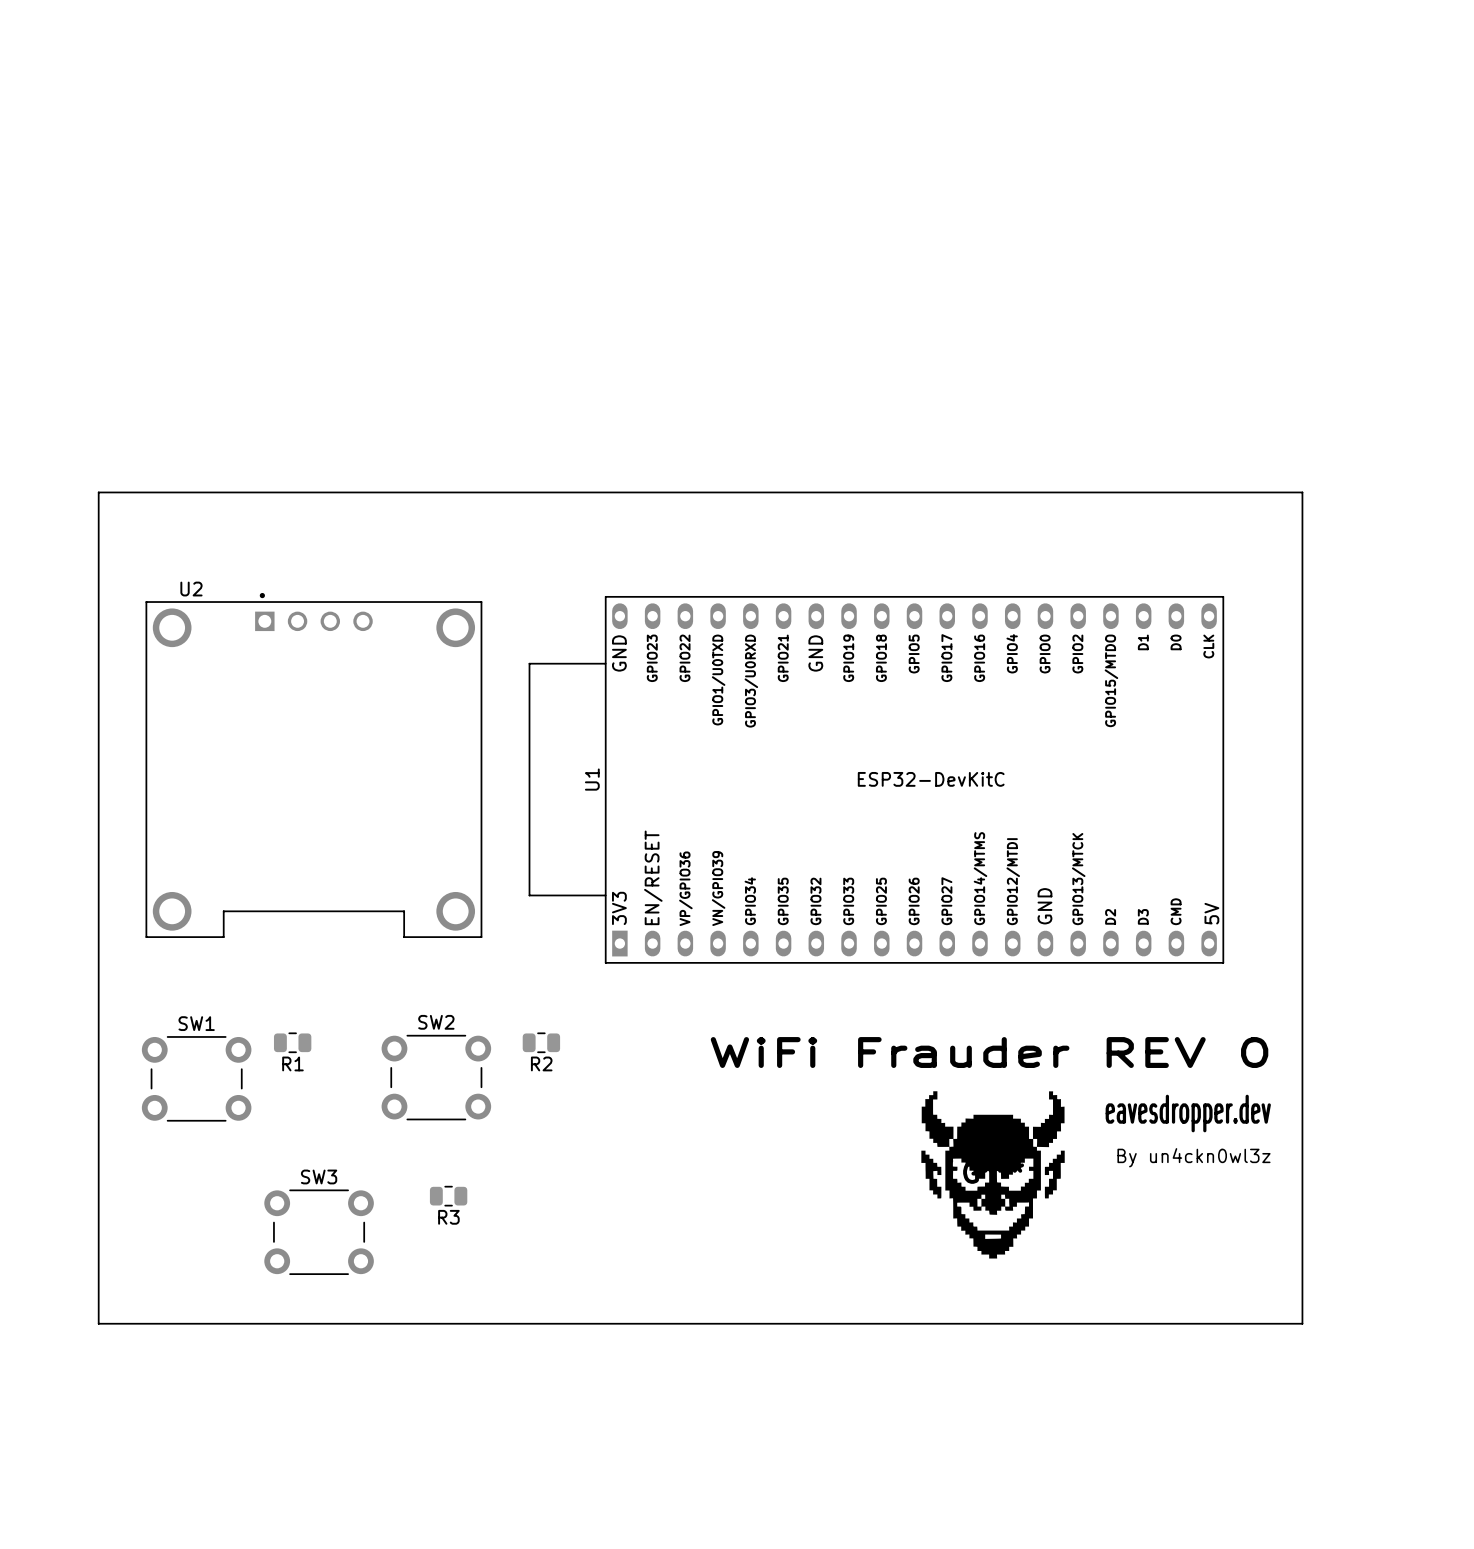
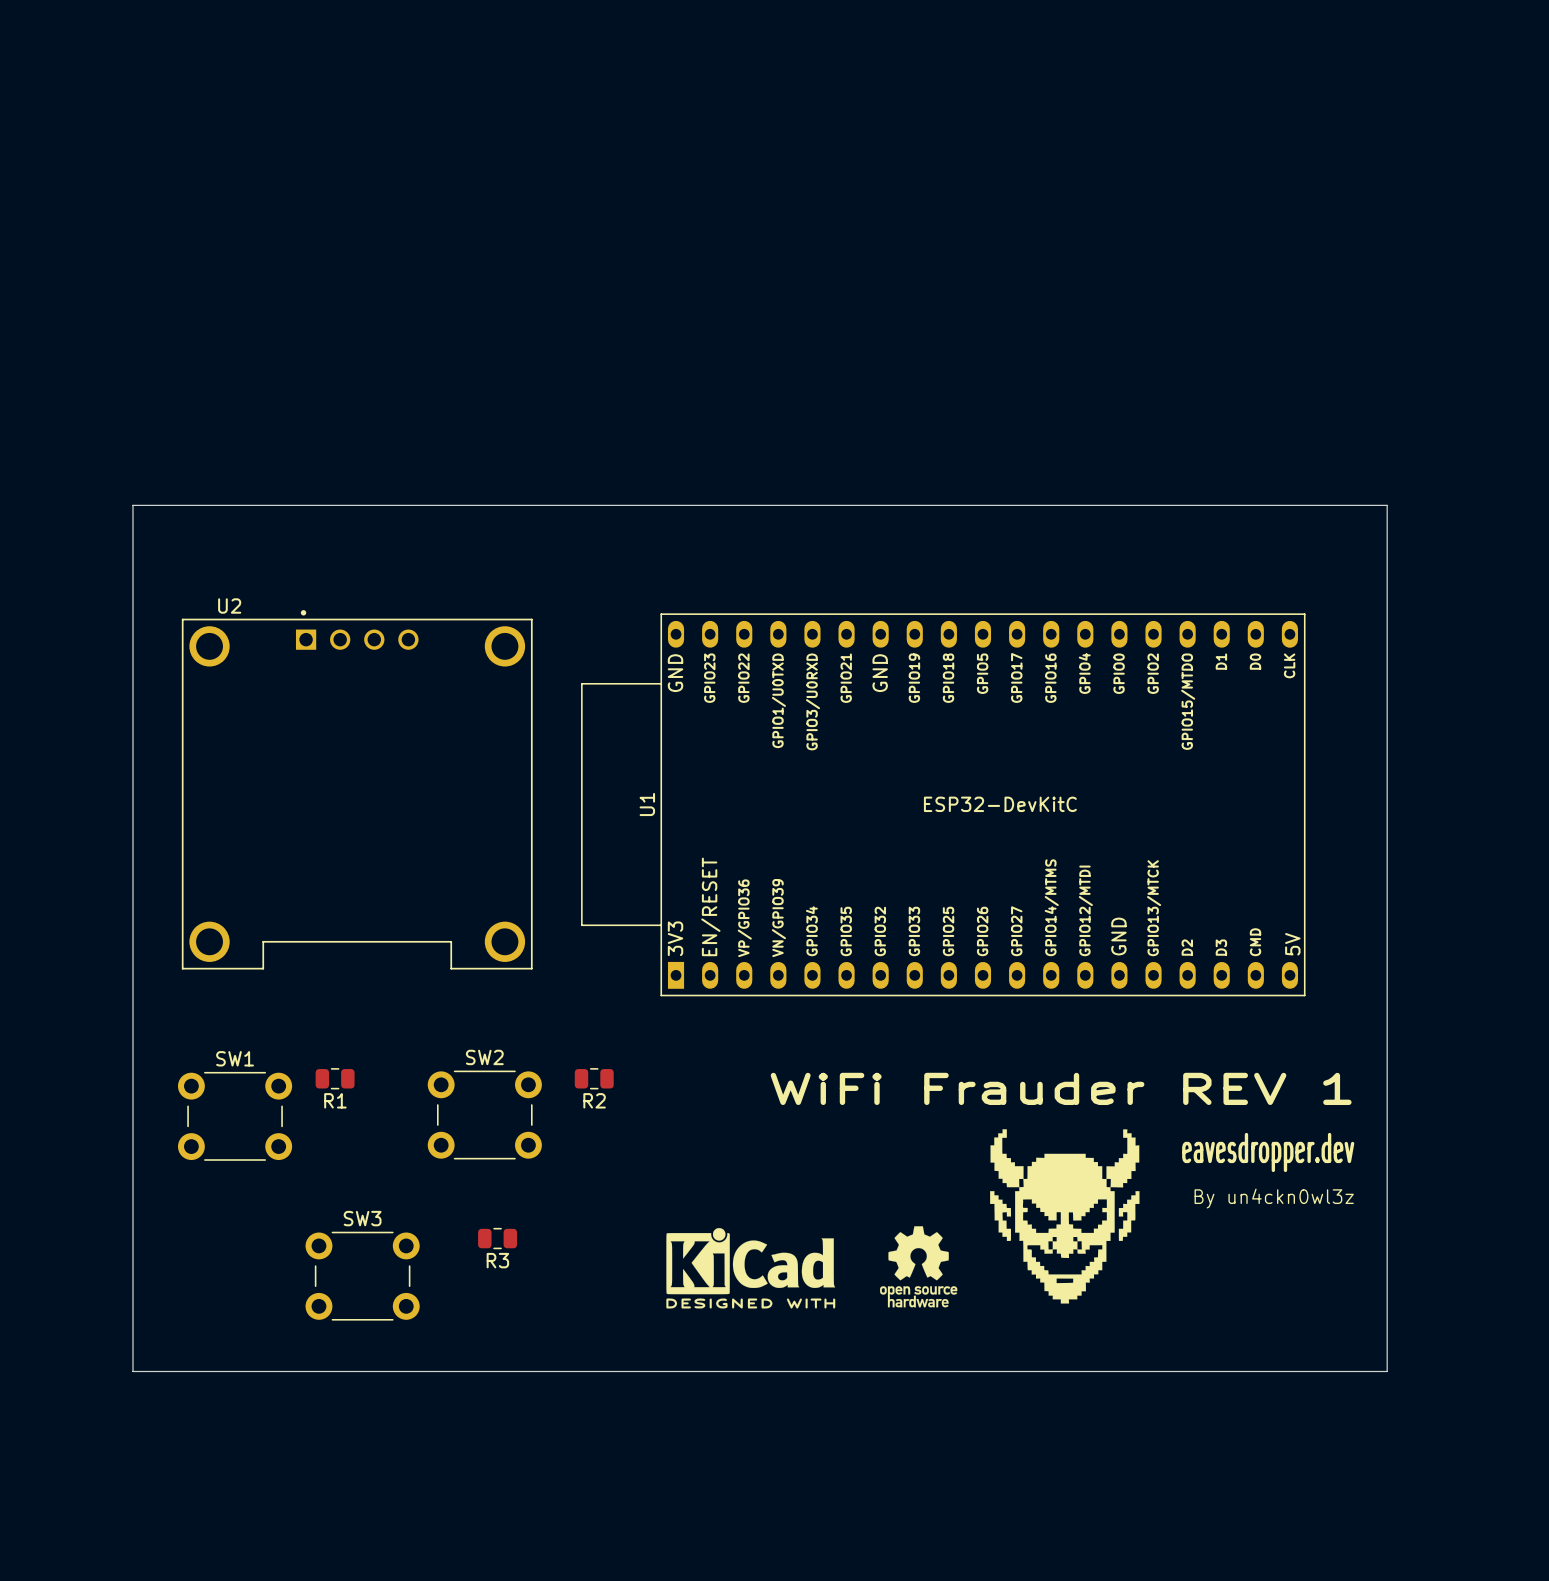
text: WiFi Frauder REV 0 (989, 1052) -> WiFi Frauder REV 1 (1061, 1088)
drawing: none -> [990, 1129, 1140, 1304]
part: (993, 1174) -> none
drawing: none -> [879, 1226, 958, 1308]
drawing: none -> [666, 1228, 836, 1309]

